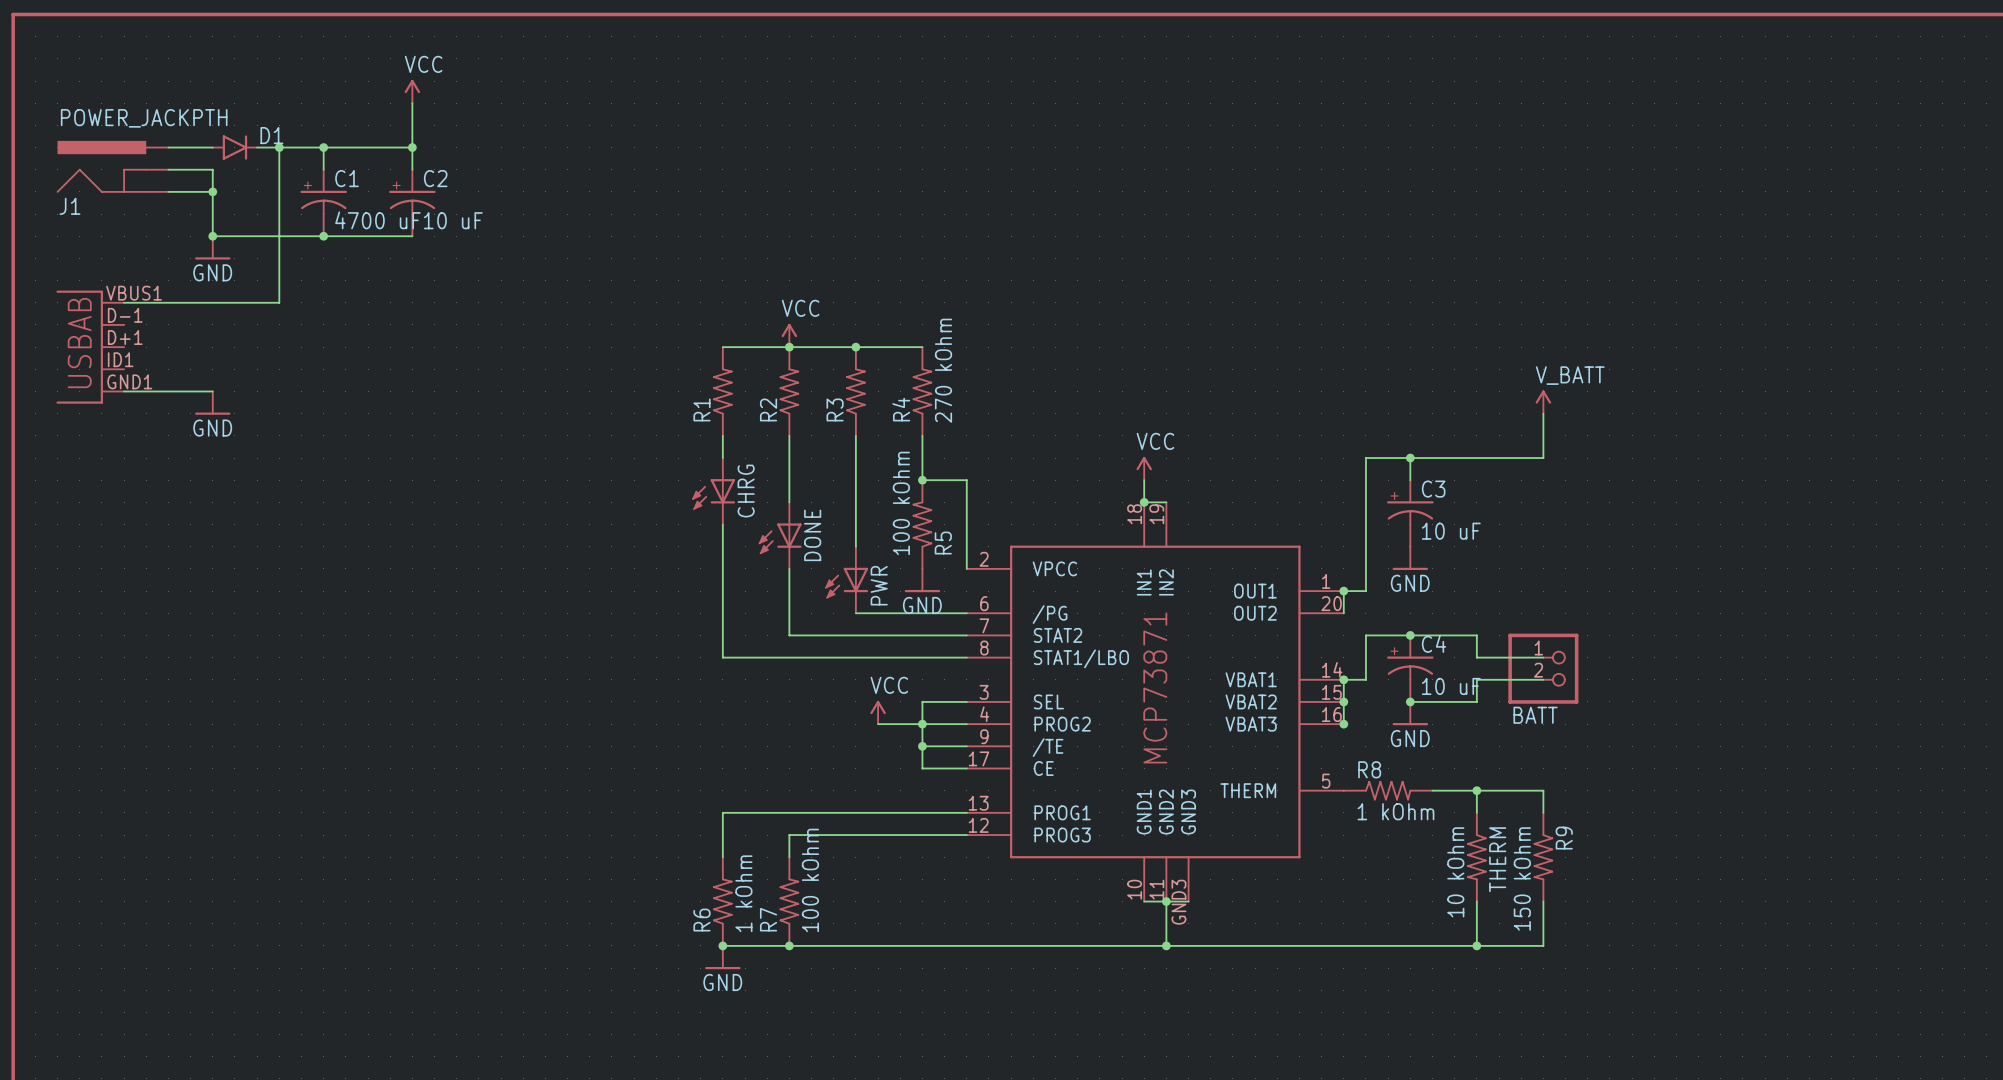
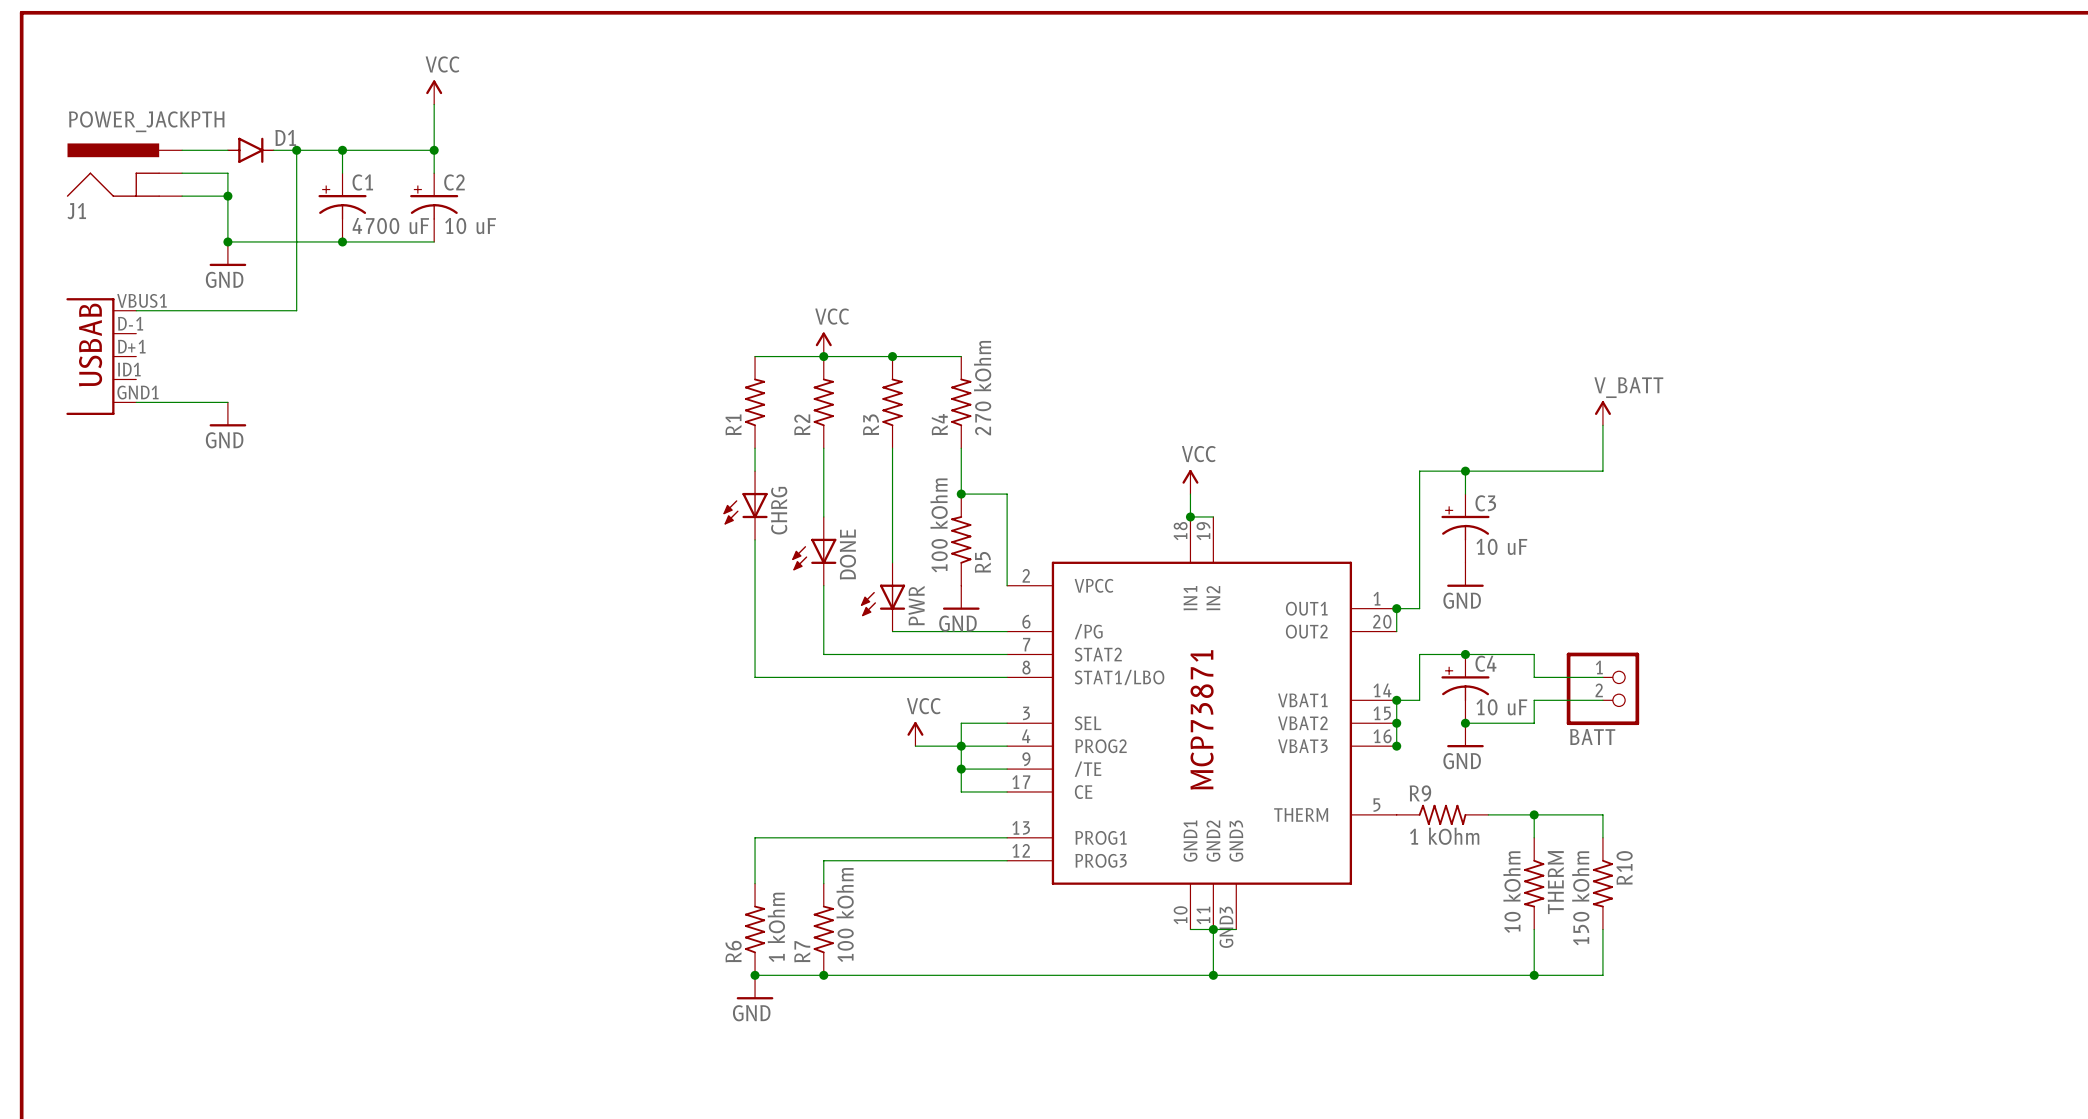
R8 name: R8 (1369, 769) -> R9 (1420, 793)
R9 name: R9 (1564, 838) -> R10 (1624, 867)

